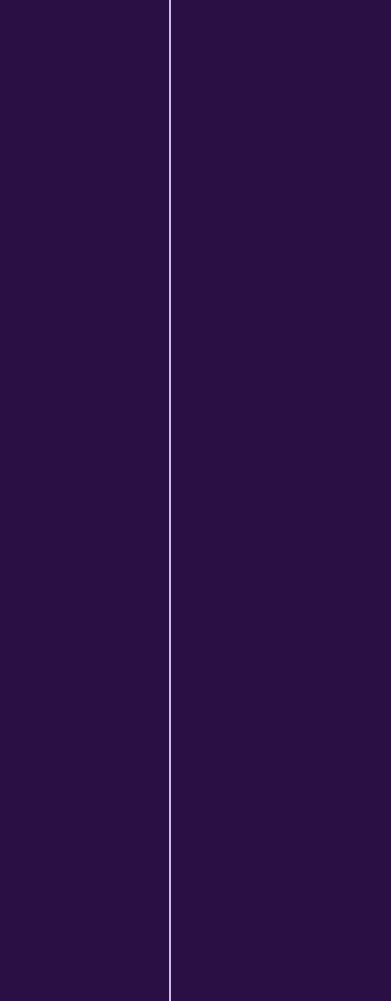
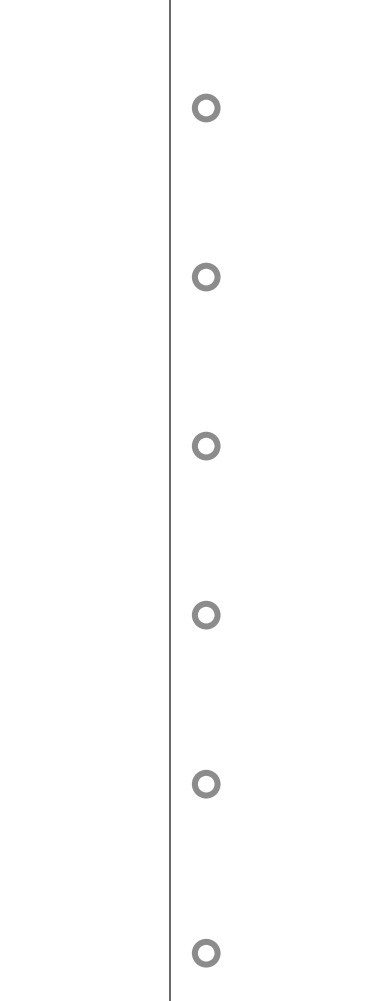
via: none -> (206, 108)
via: none -> (206, 277)
via: none -> (206, 446)
via: none -> (206, 615)
via: none -> (206, 784)
via: none -> (206, 953)

